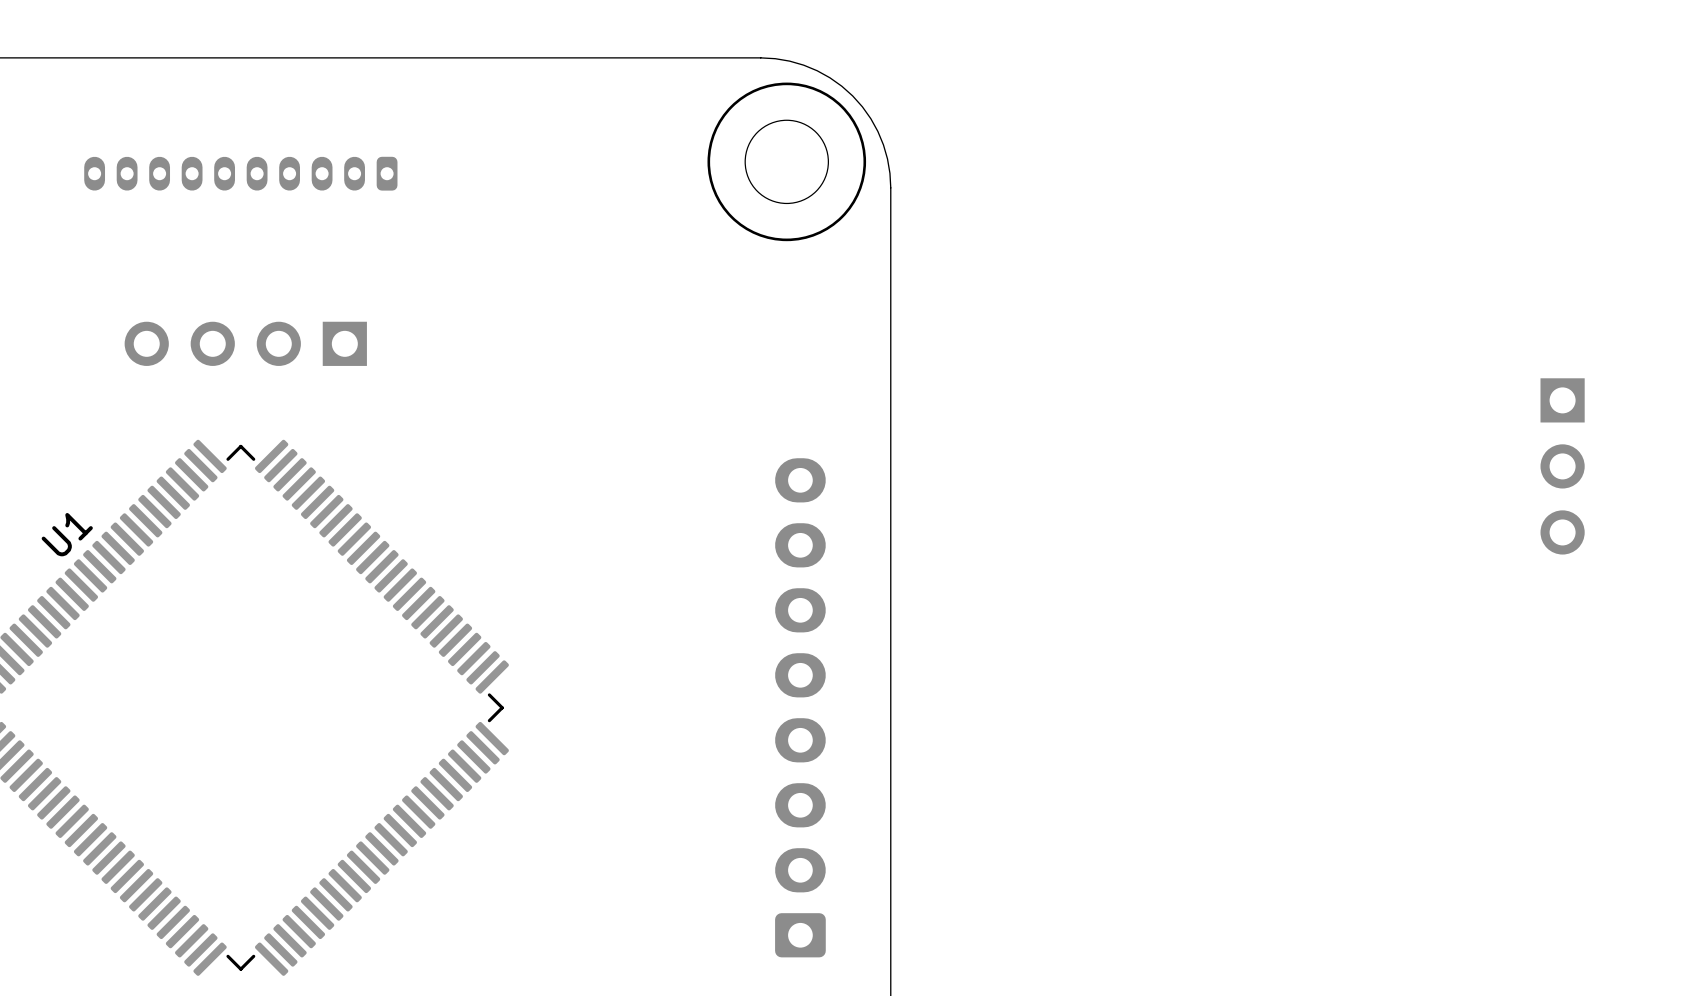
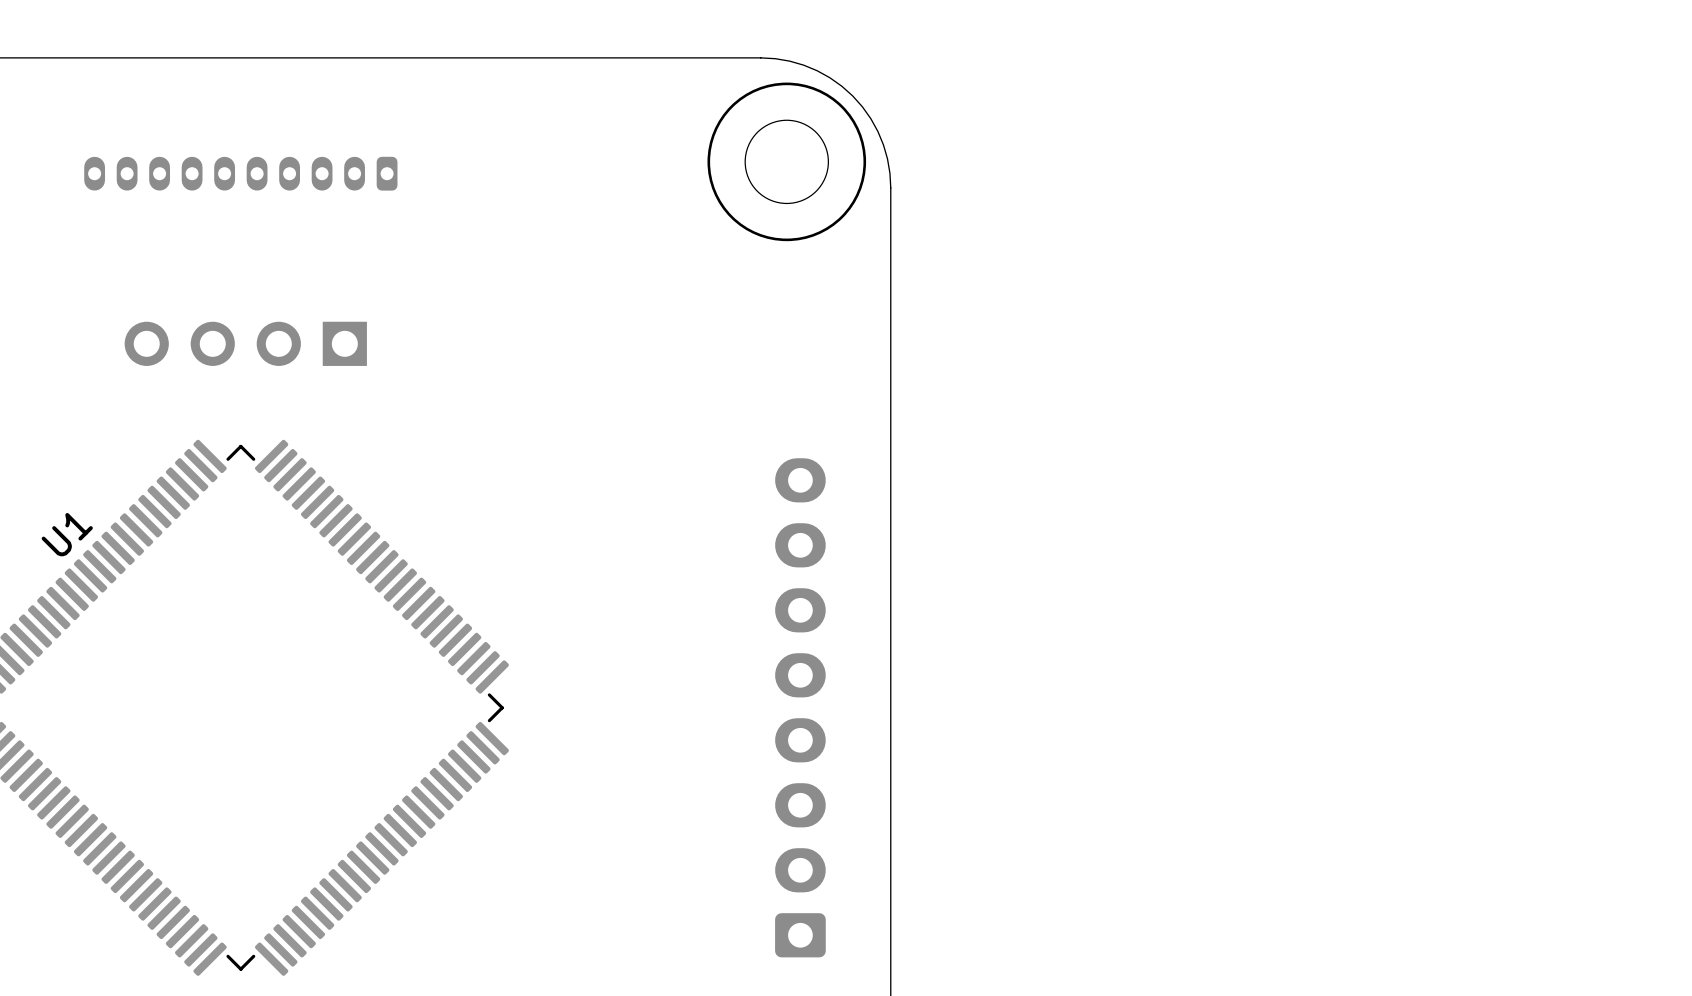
part: (1562, 466) -> none

